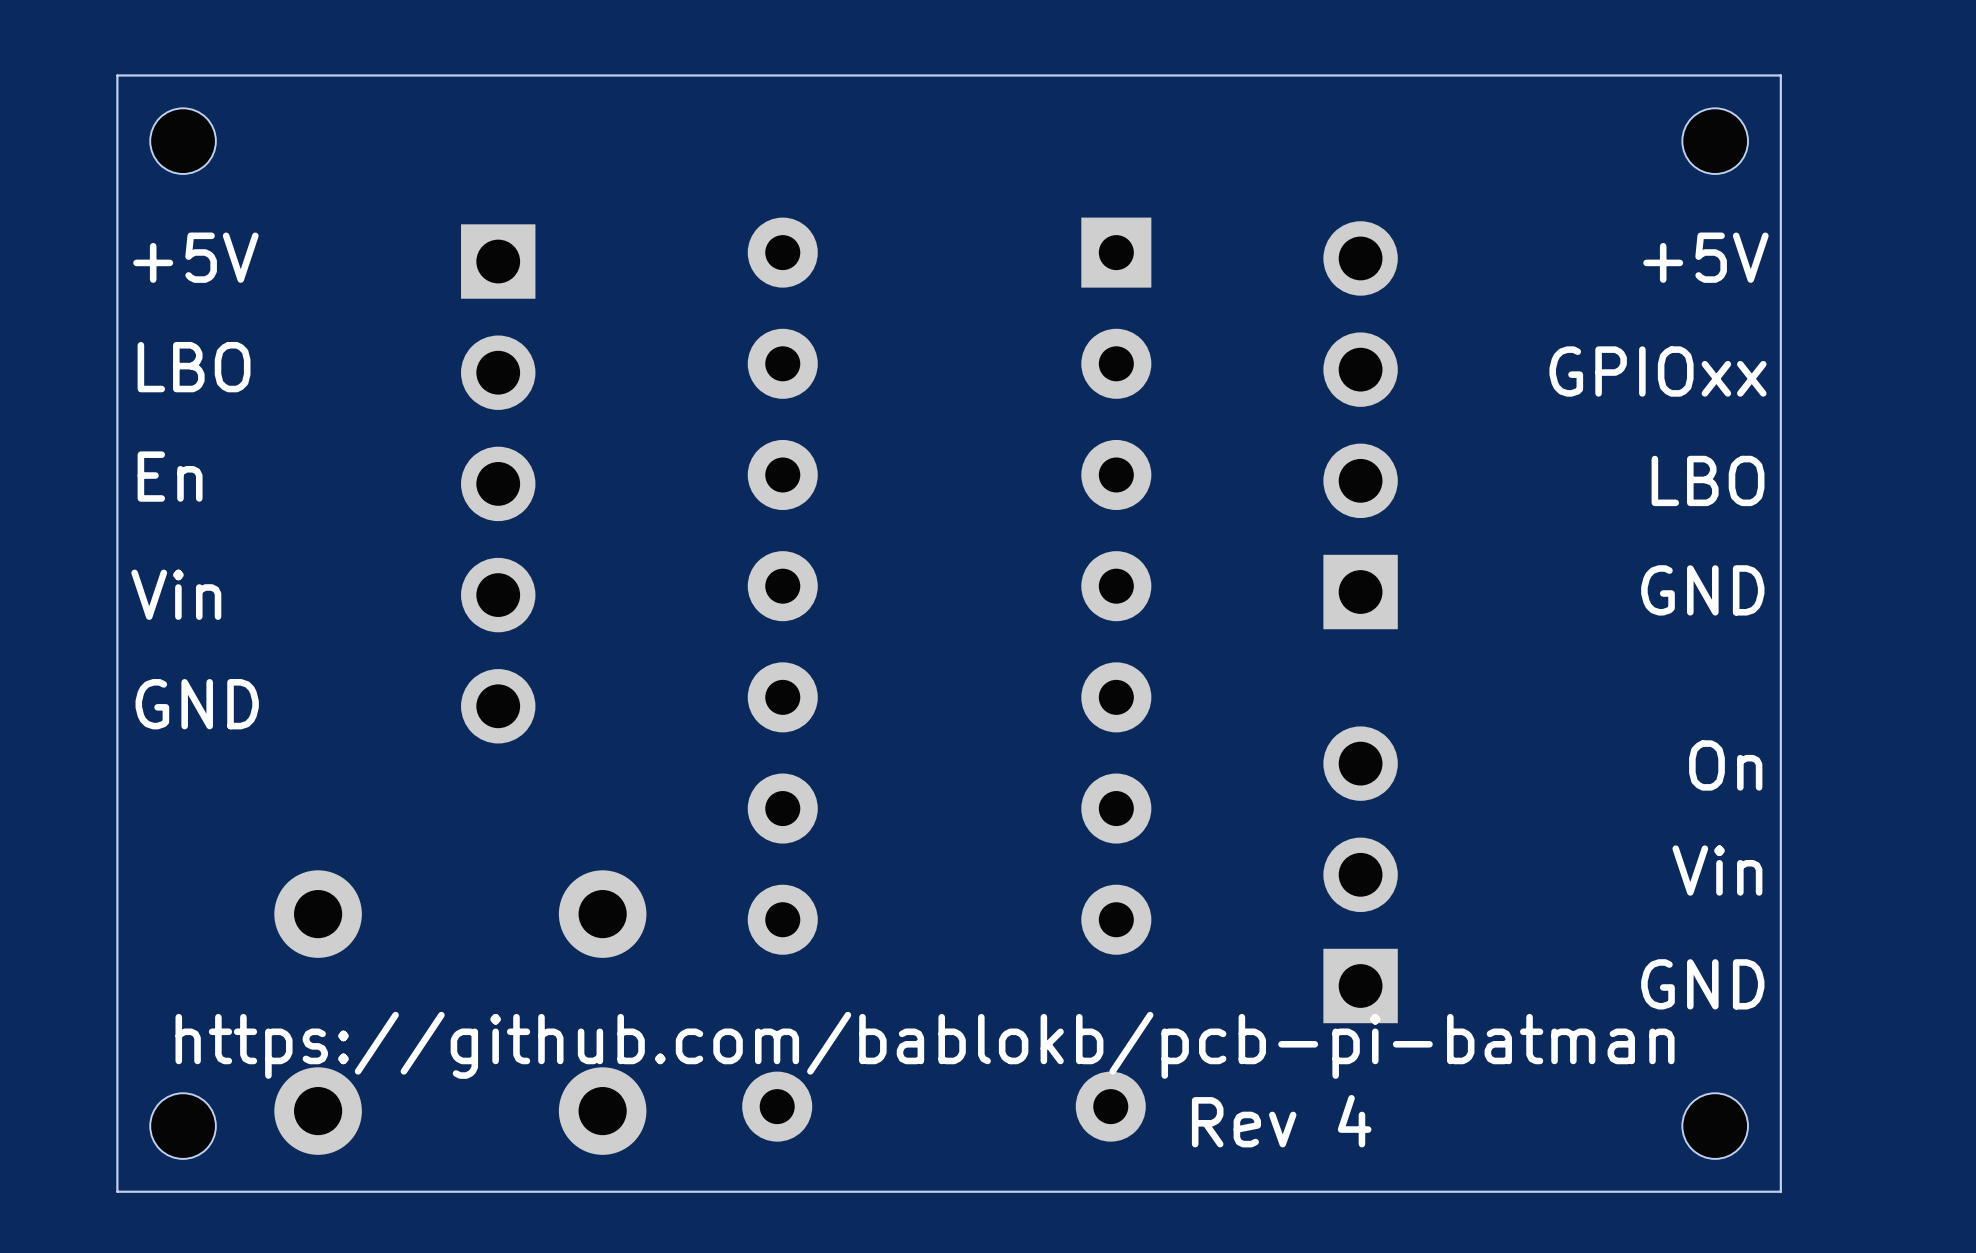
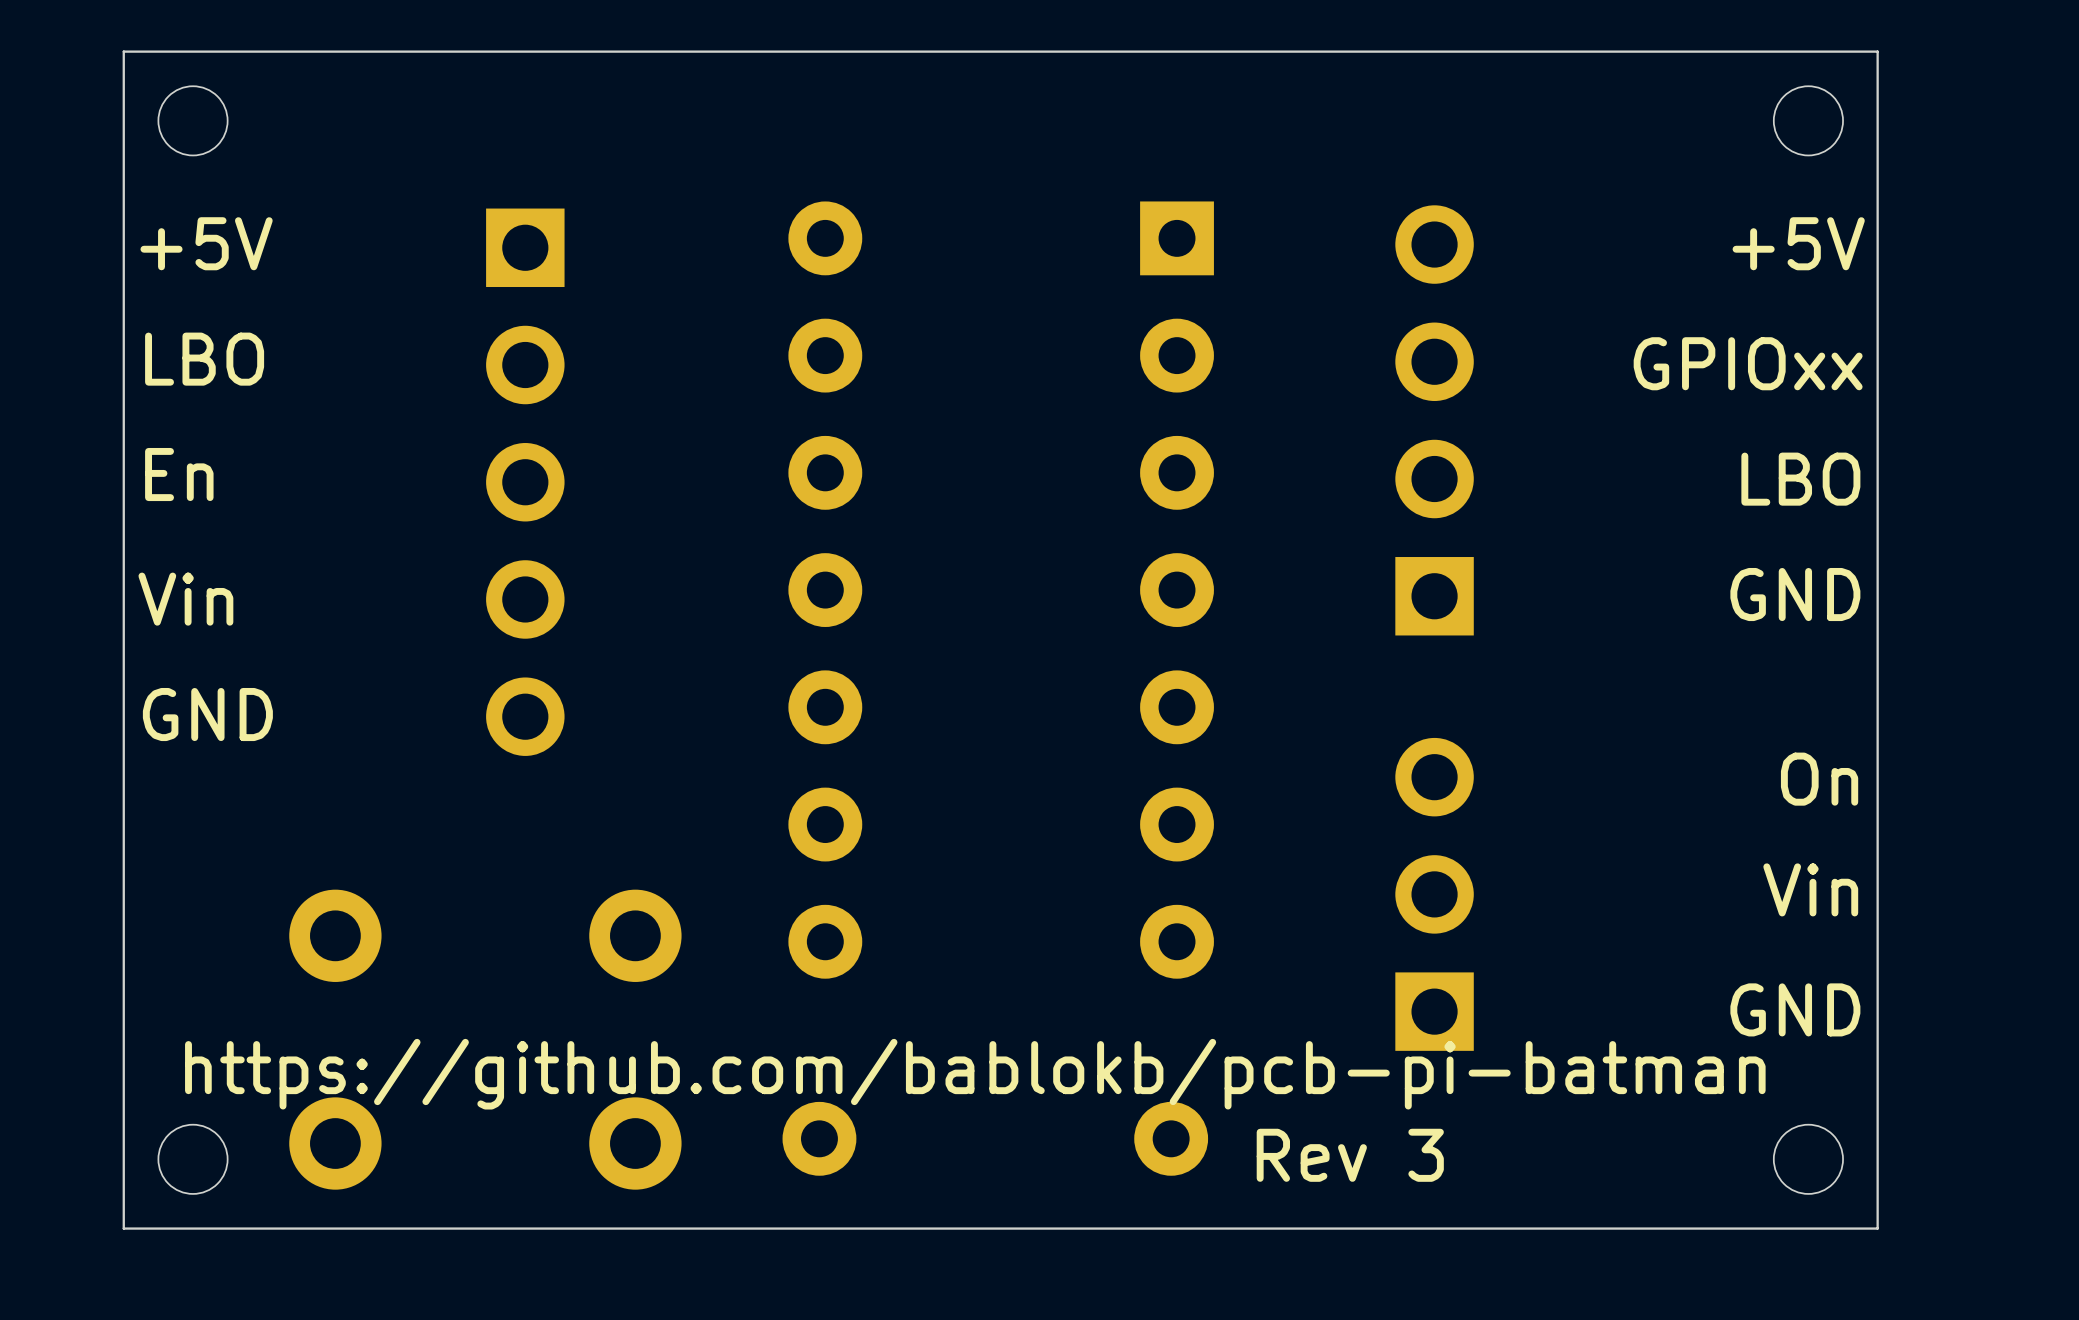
text: Rev 4 (1281, 1121) -> Rev 3 (1350, 1155)

